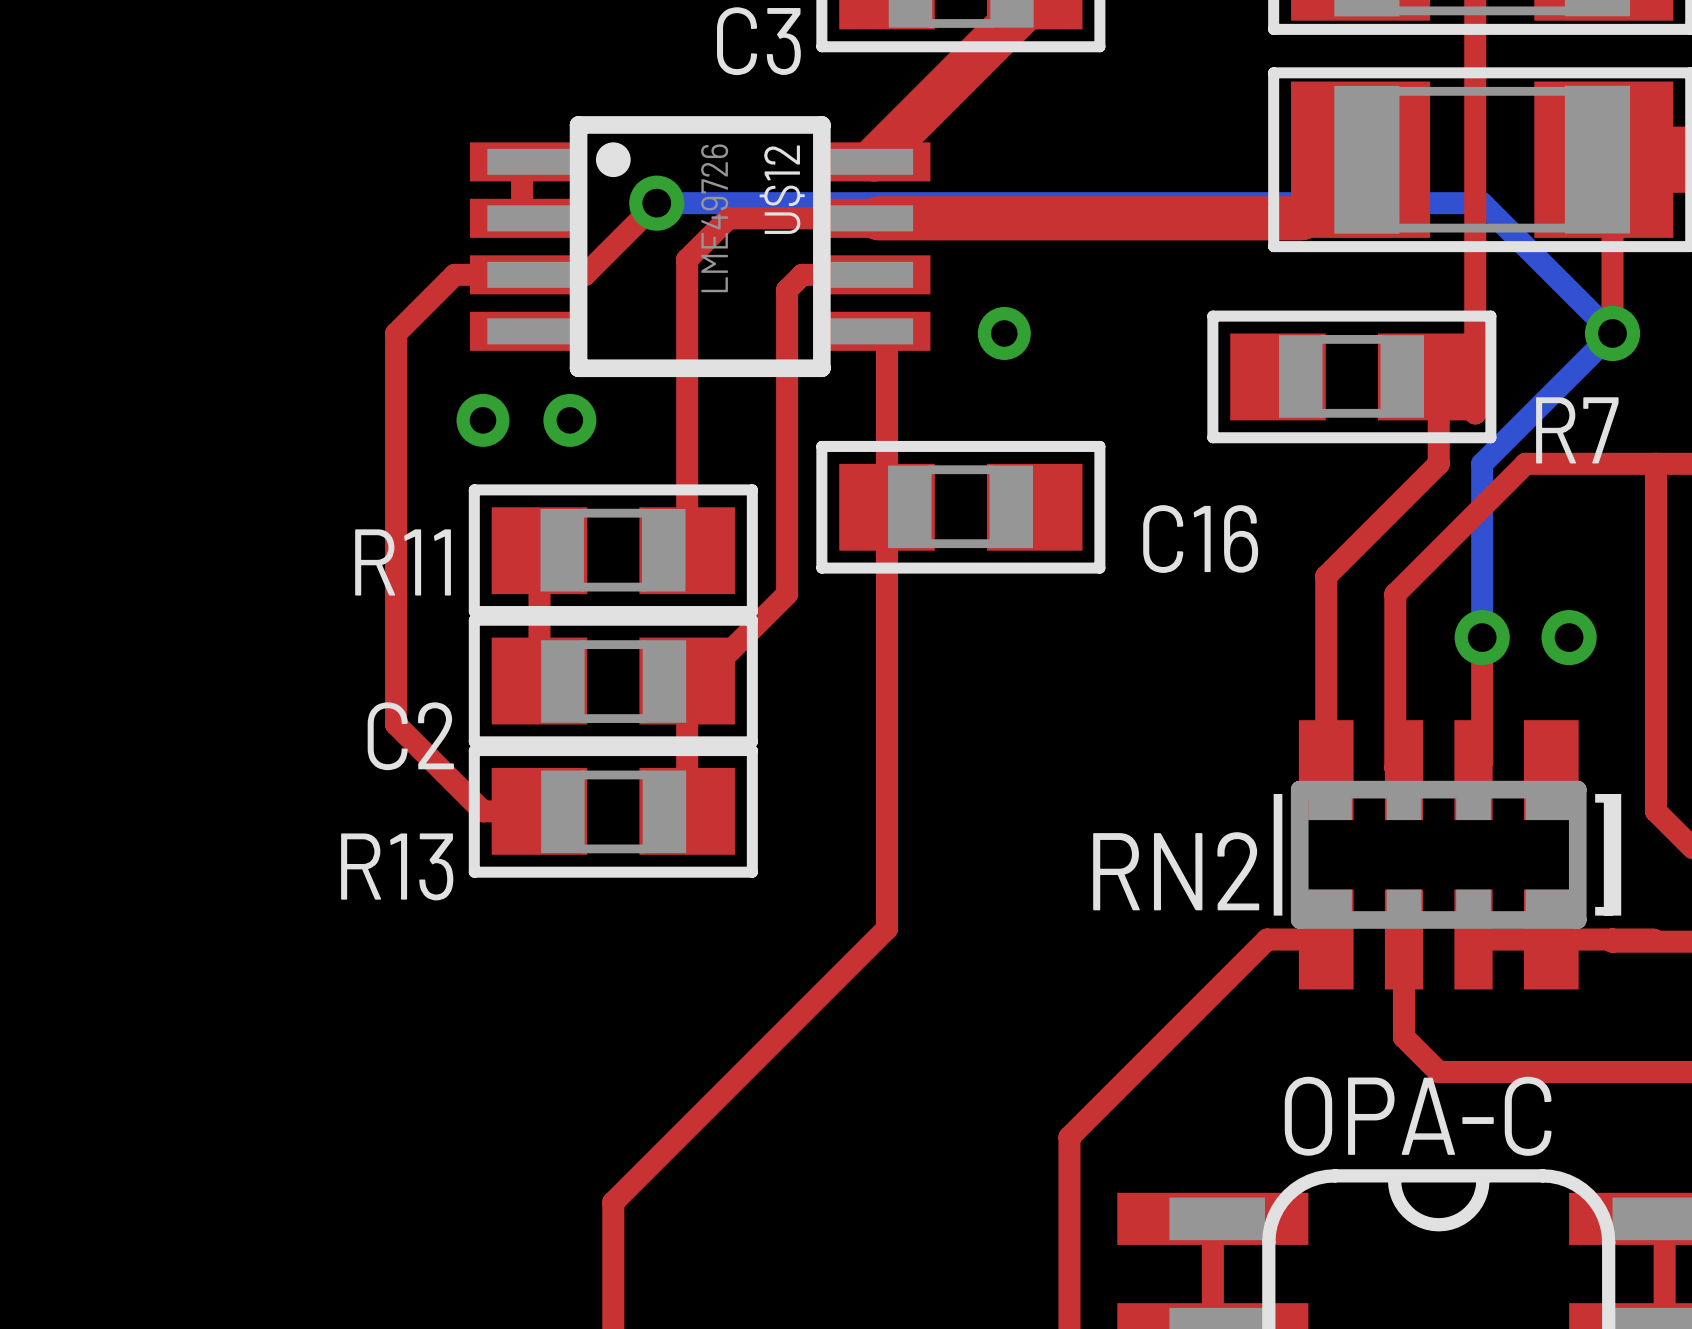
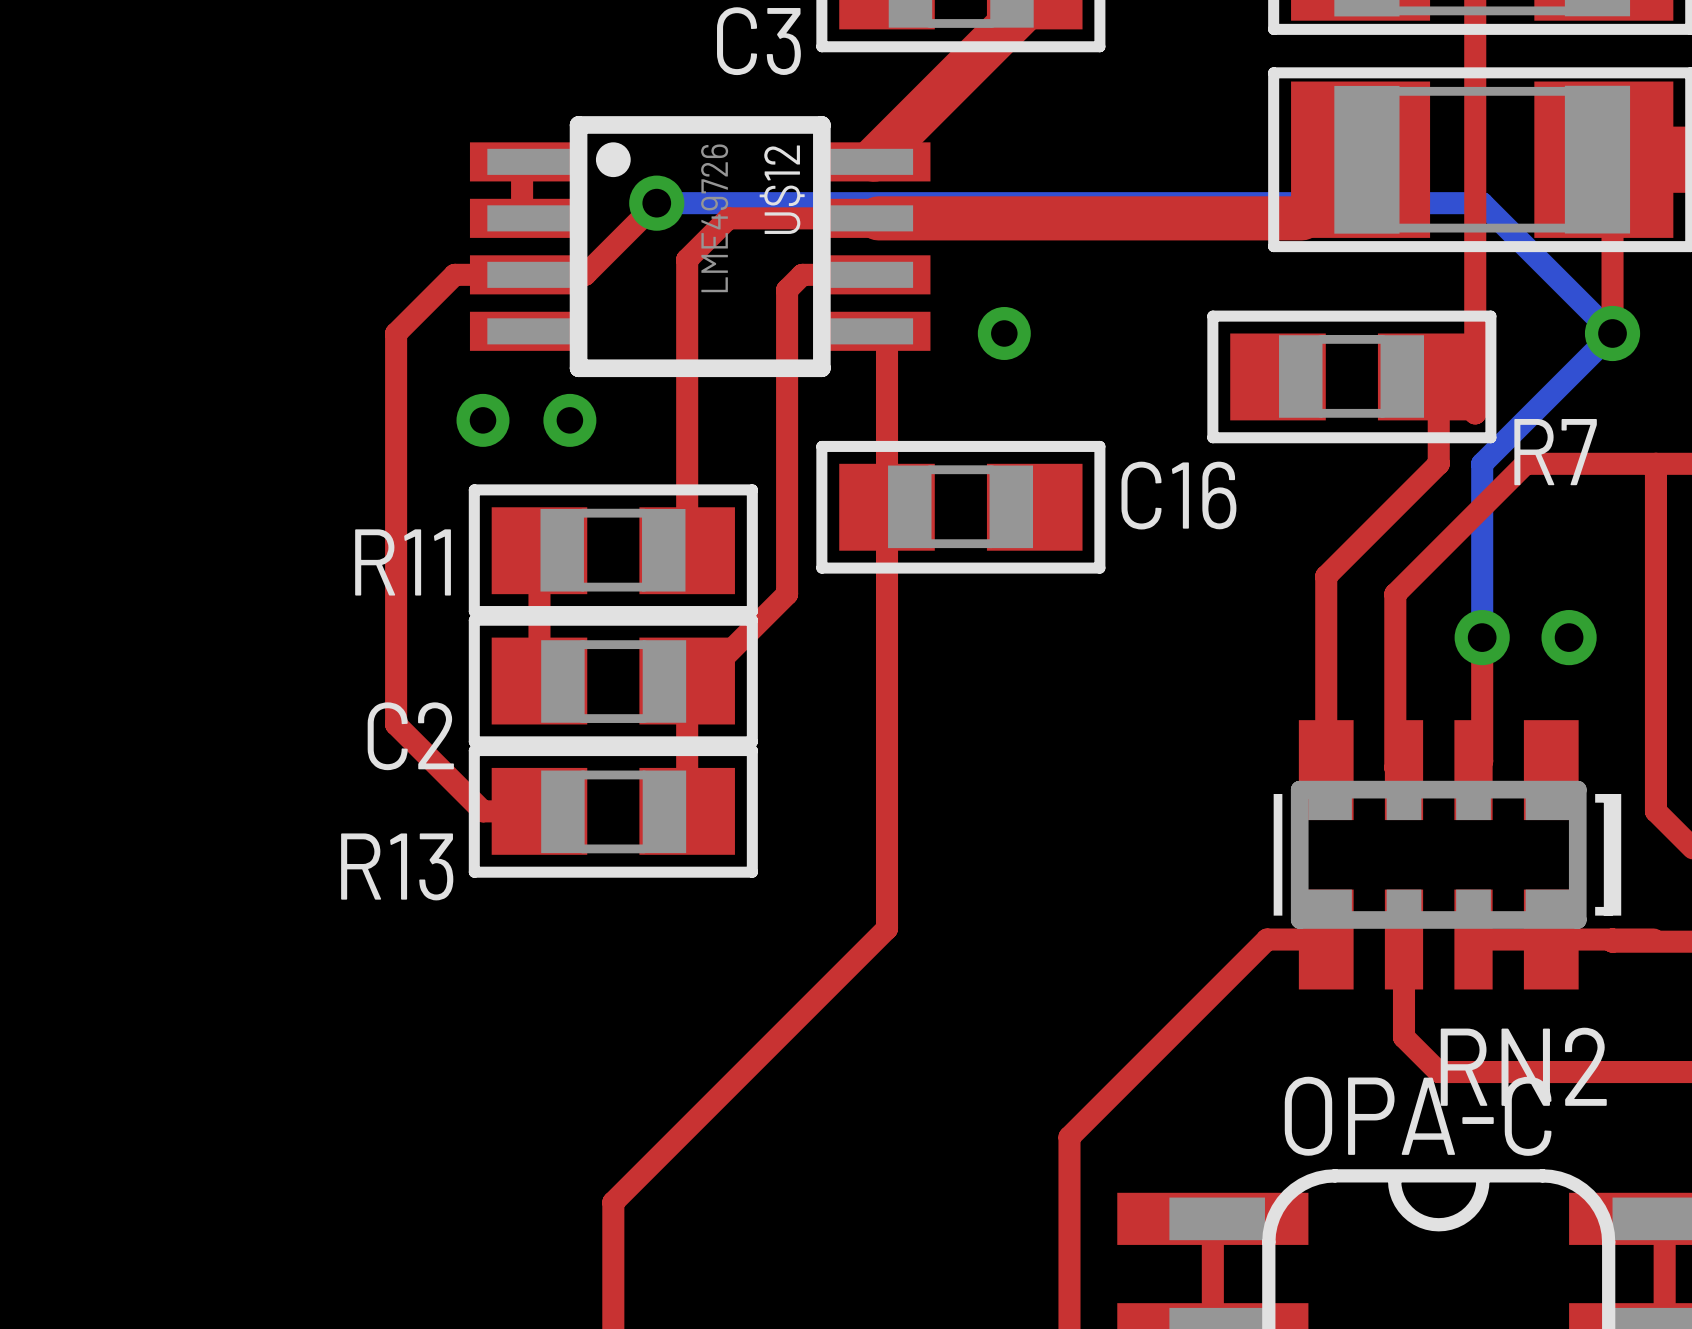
R7 name position: R7 (1577, 430) -> R7 (1555, 452)
C16 name position: C16 (1200, 539) -> C16 (1178, 495)
RN2 name position: RN2 (1176, 871) -> RN2 (1523, 1066)

